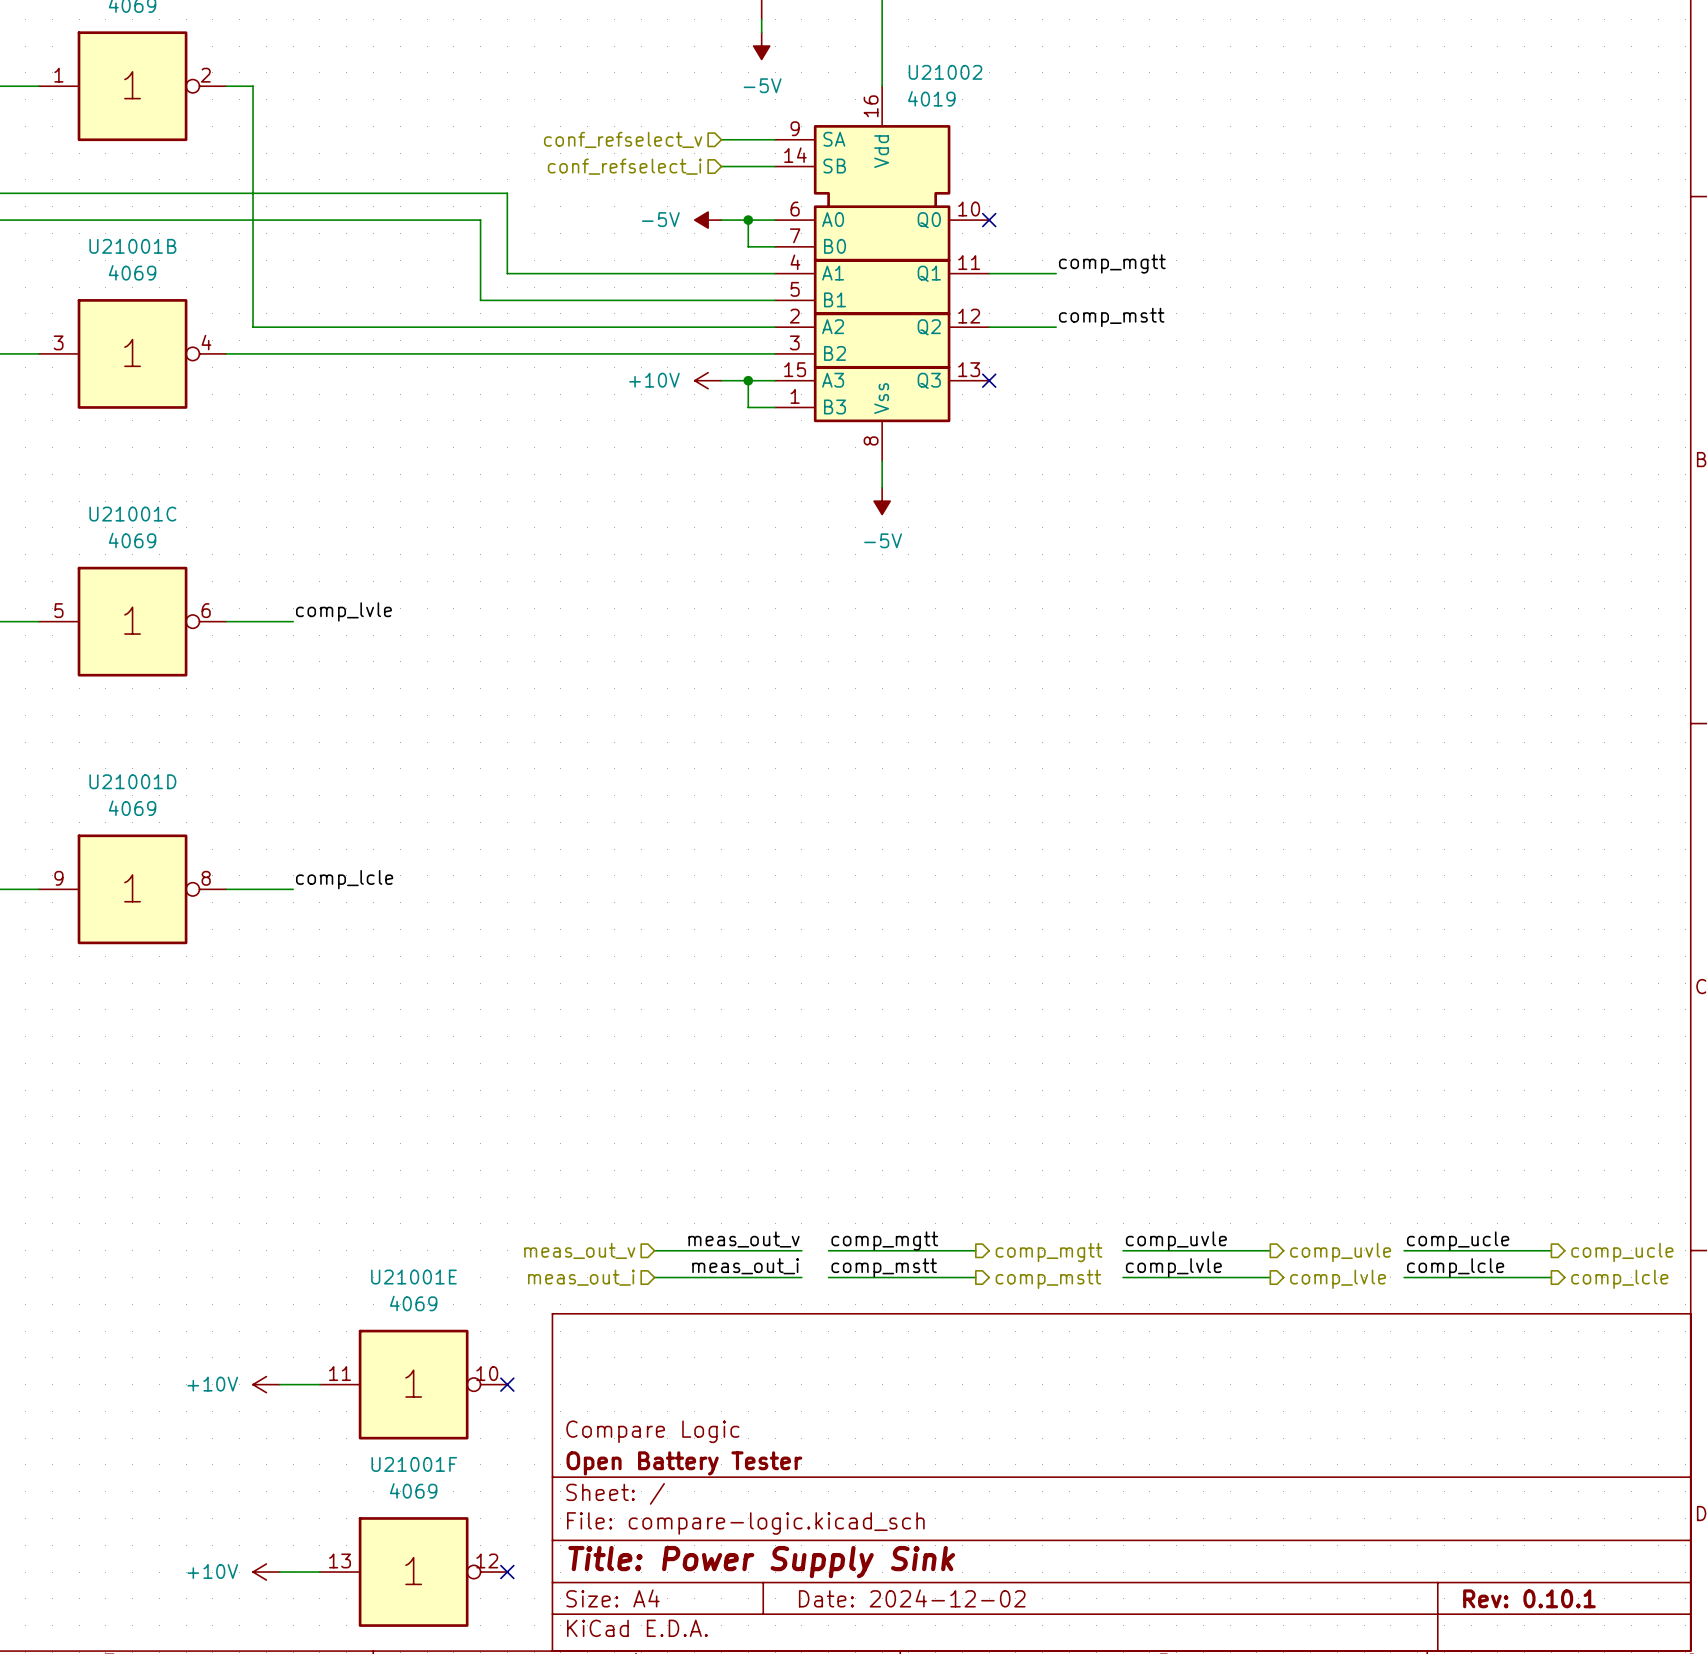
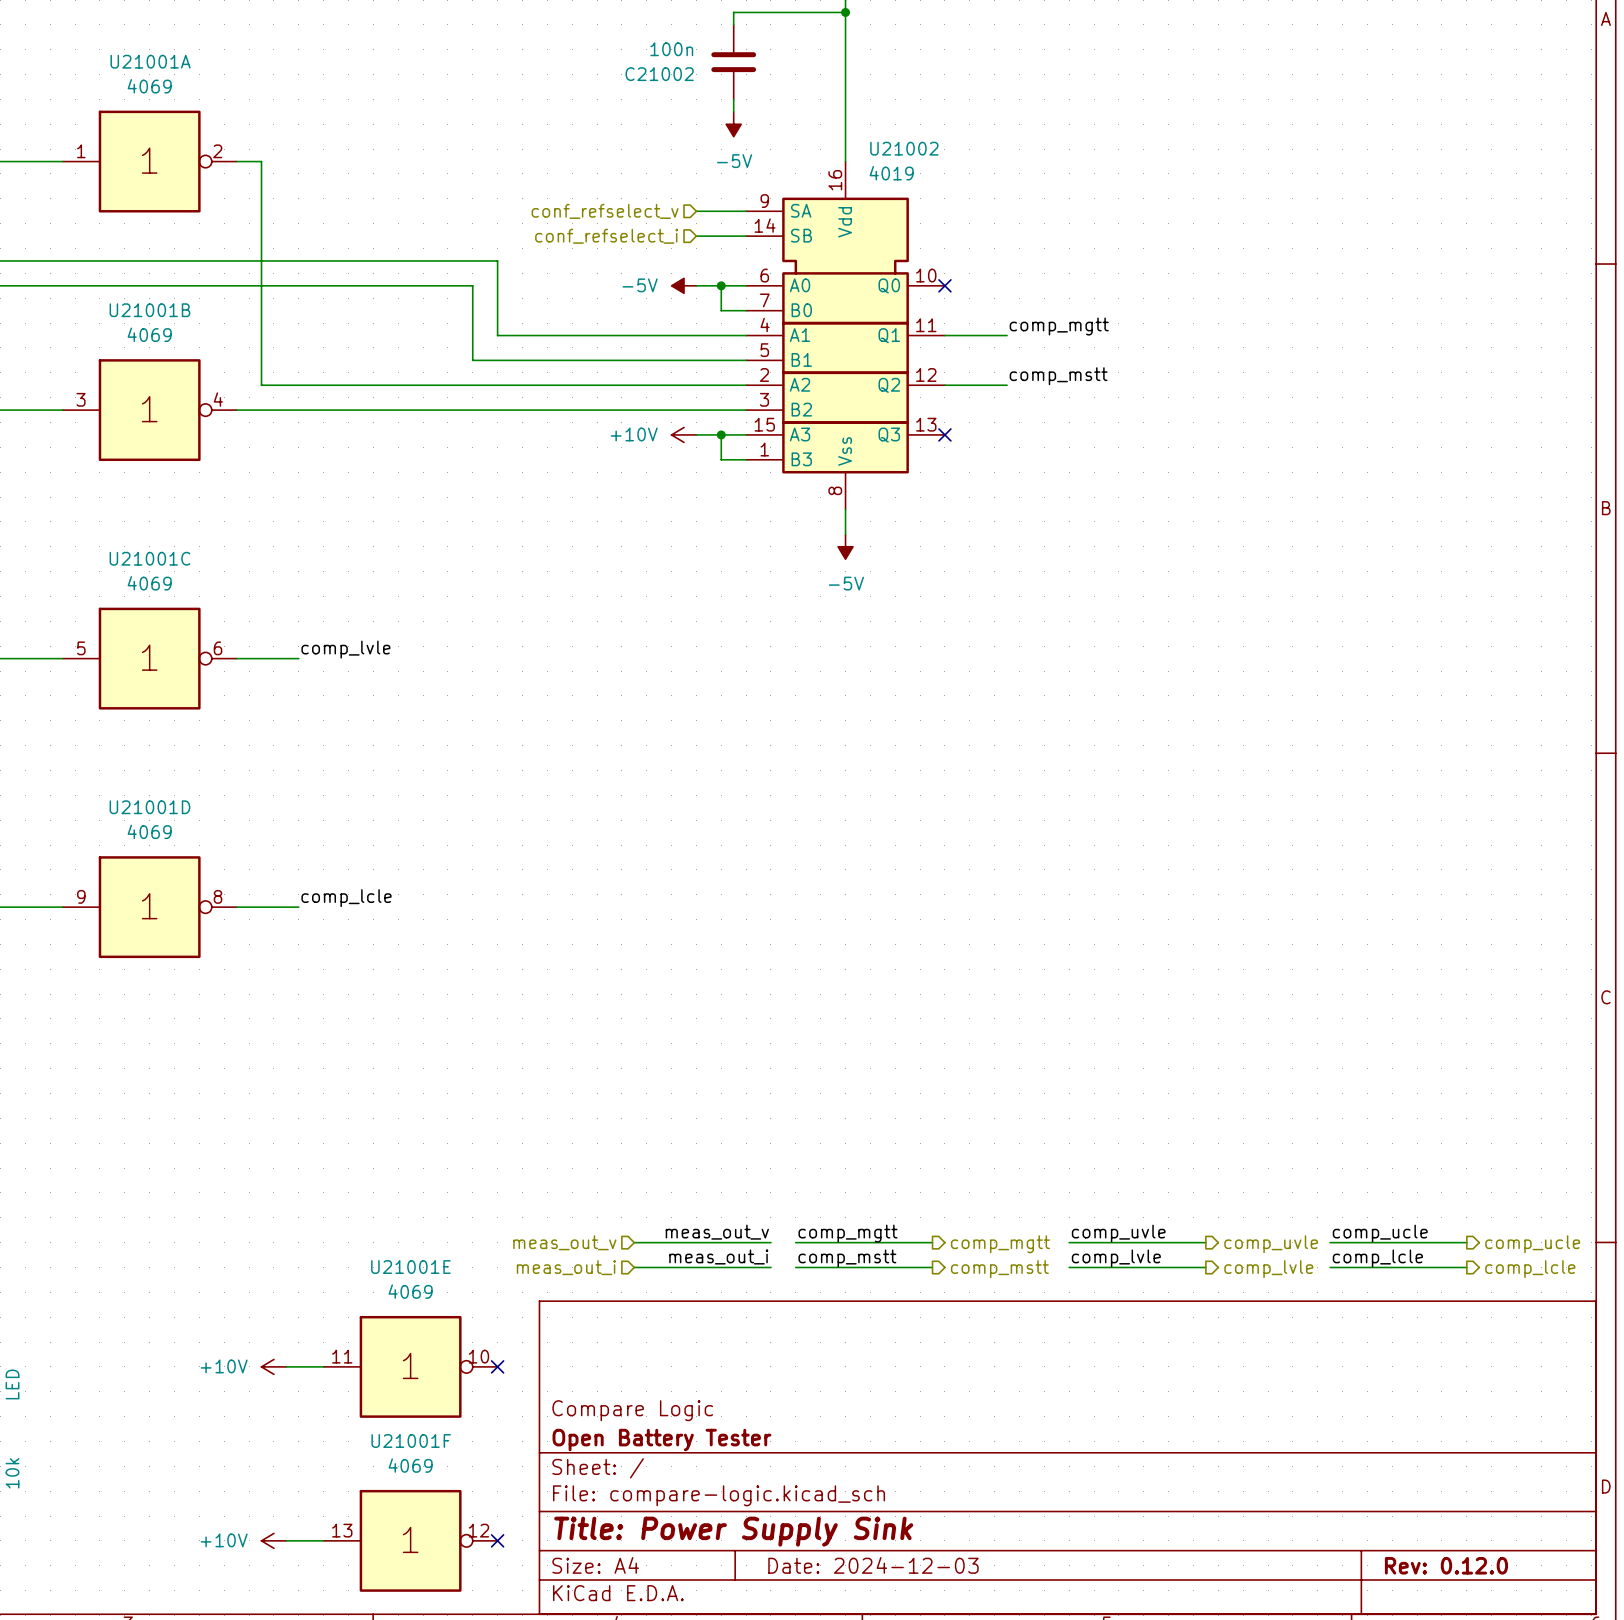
title block: Date: 2024-12-02 (912, 1598) -> Date: 2024-12-03 (873, 1565)
title block: Rev: 0.10.1 (1529, 1598) -> Rev: 0.12.0 (1446, 1565)

